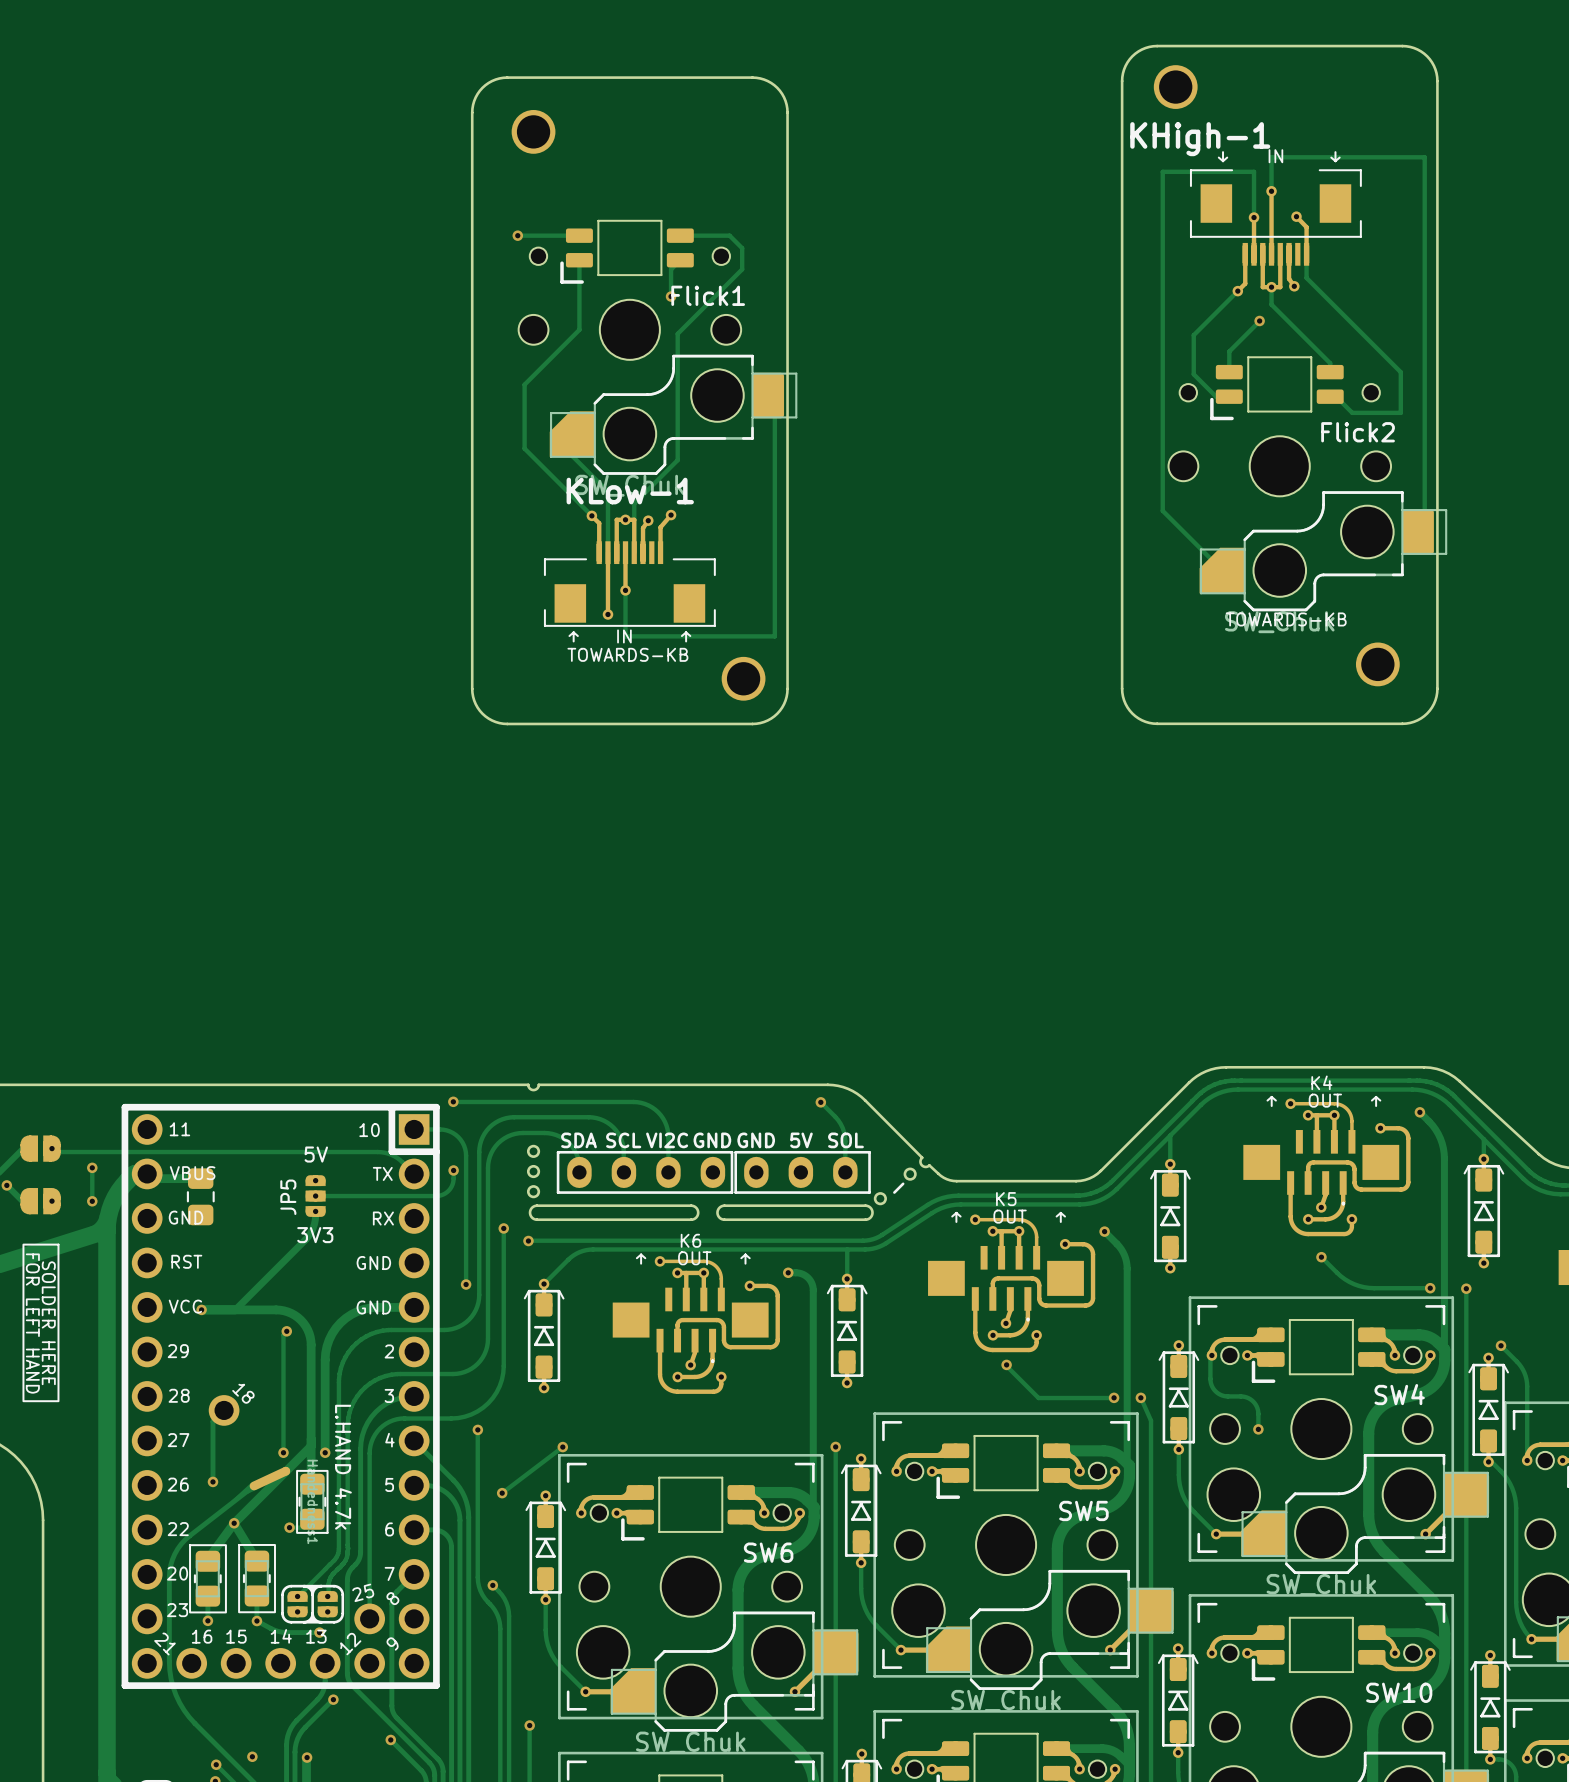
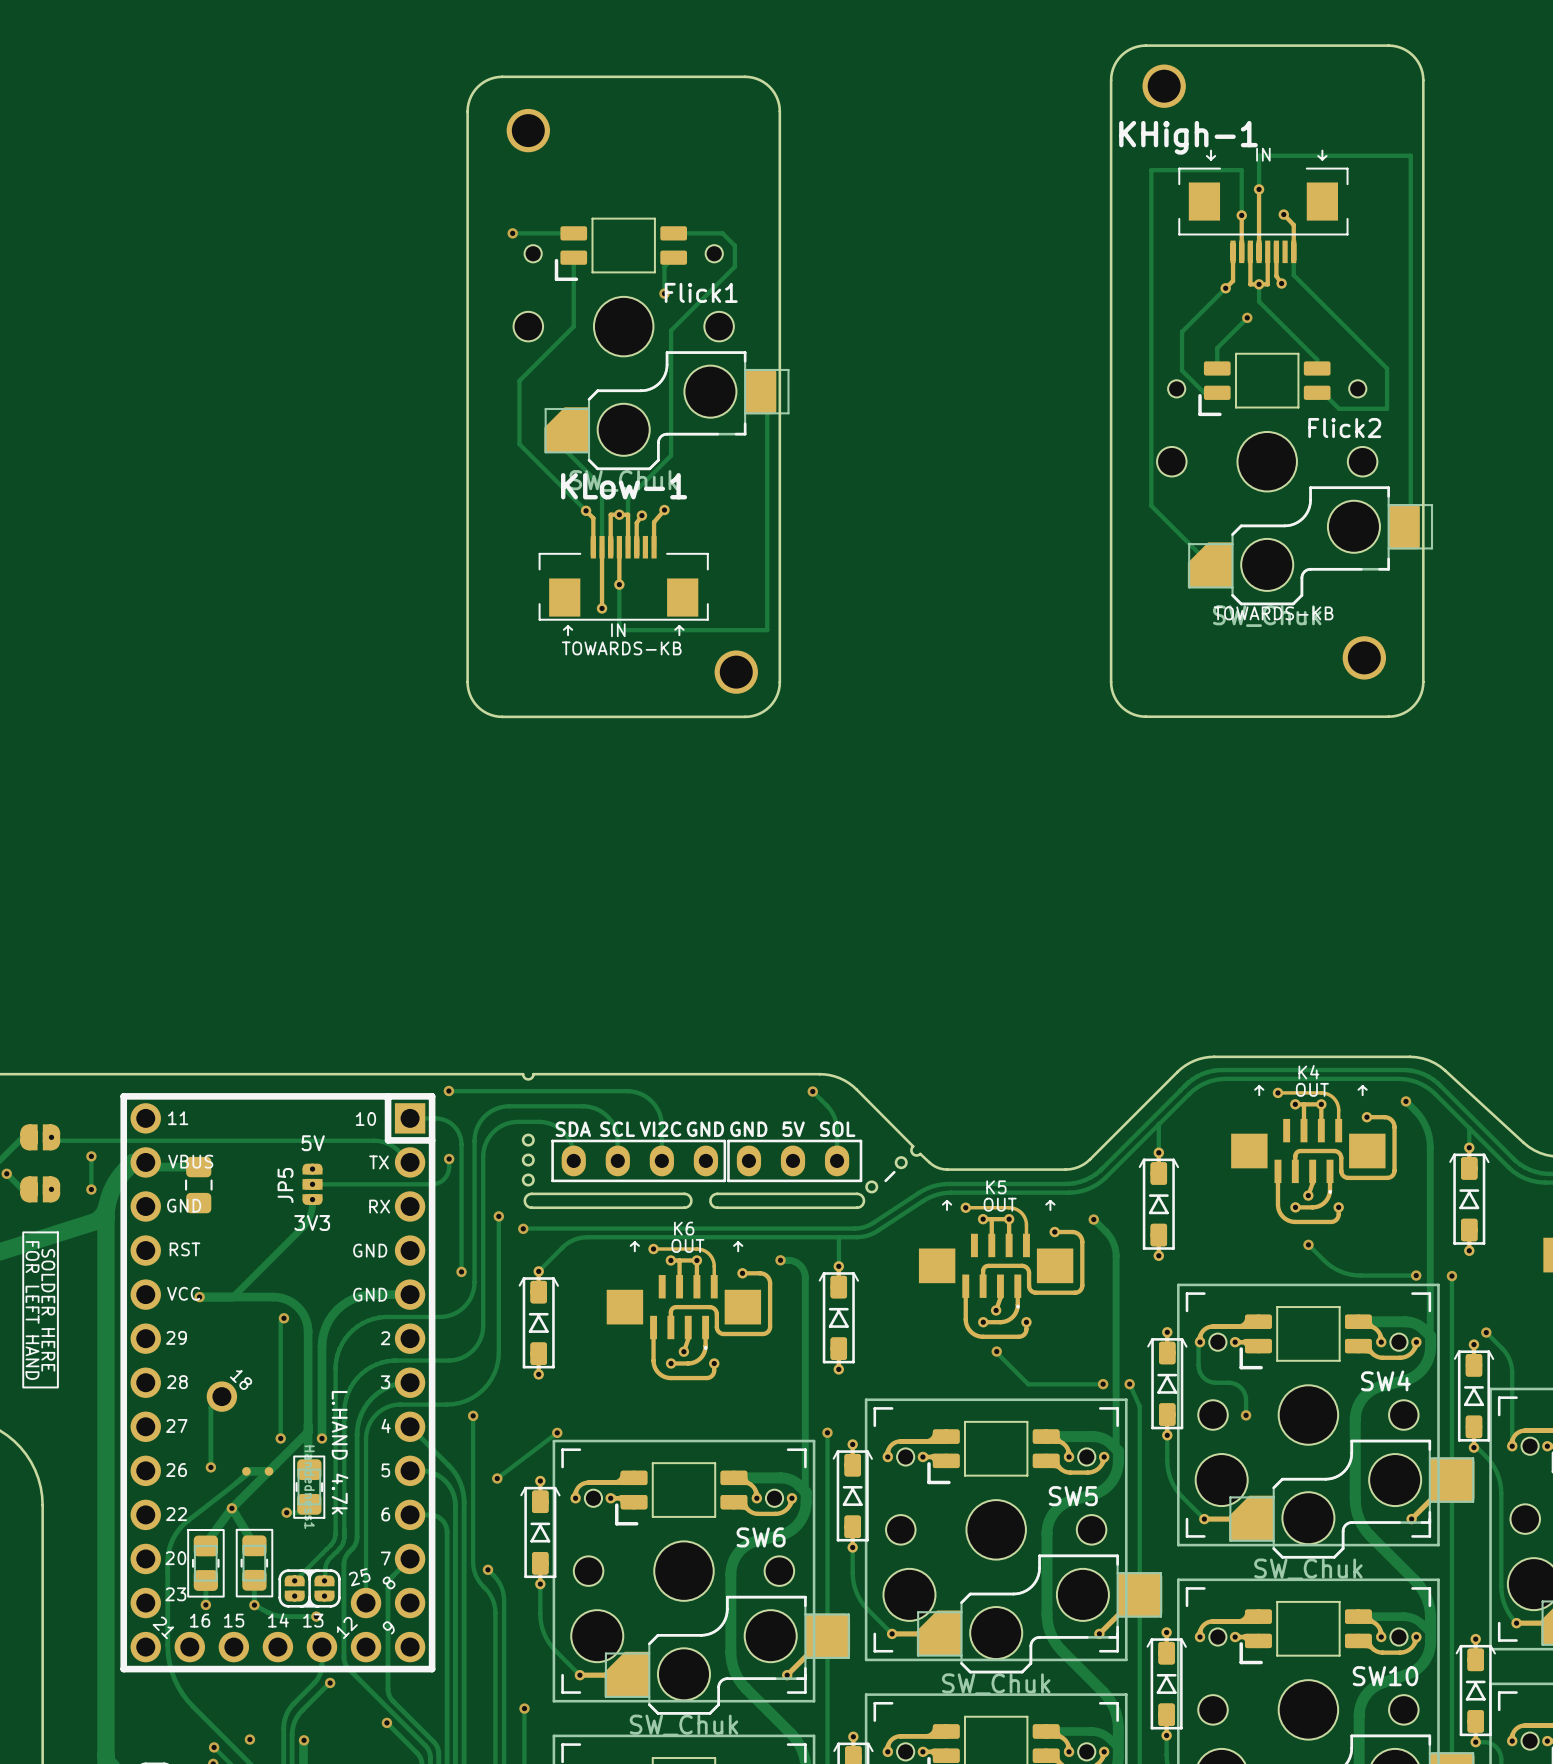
part footprint: [249, 1466, 291, 1491] -> [242, 1467, 274, 1476]

